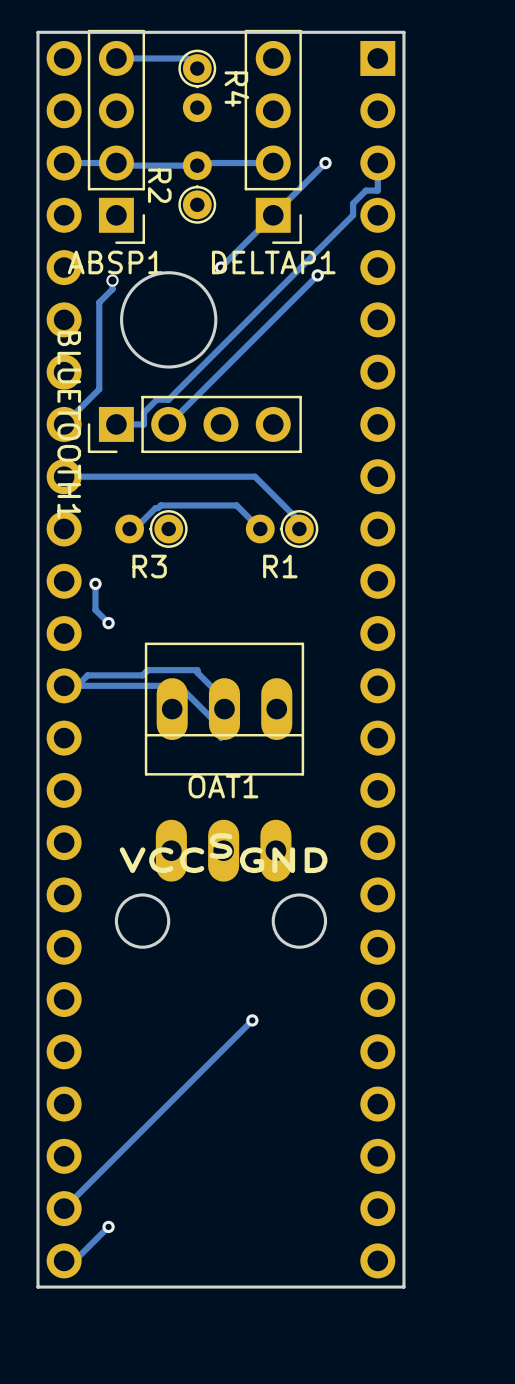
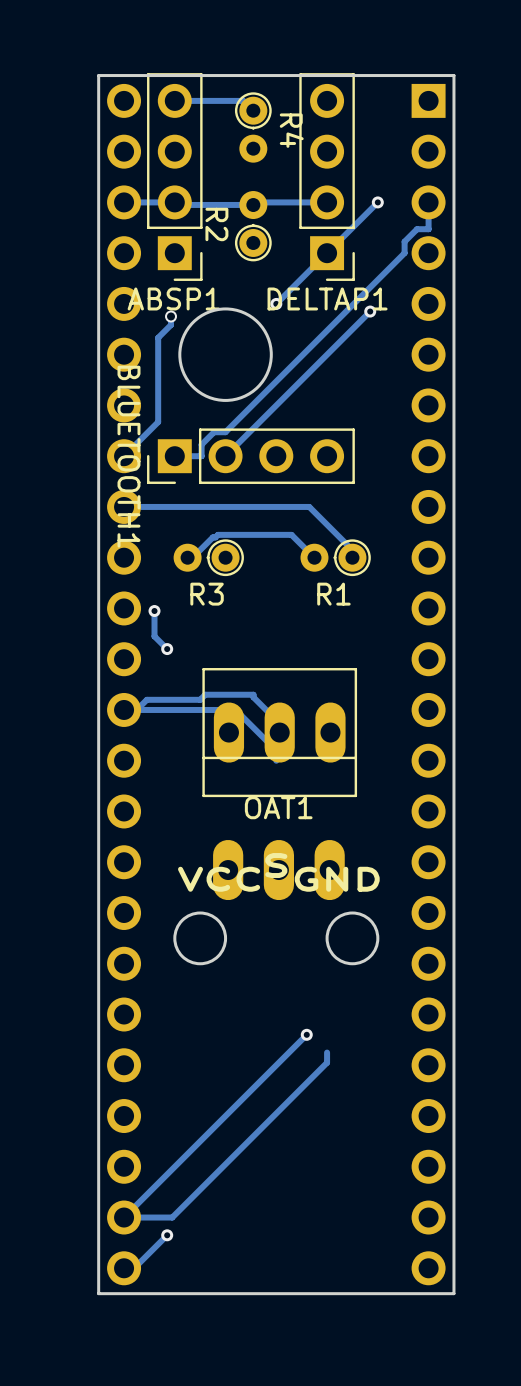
track: none -> (327, 1052) (327, 1062) (172, 1217) (124, 1217)

